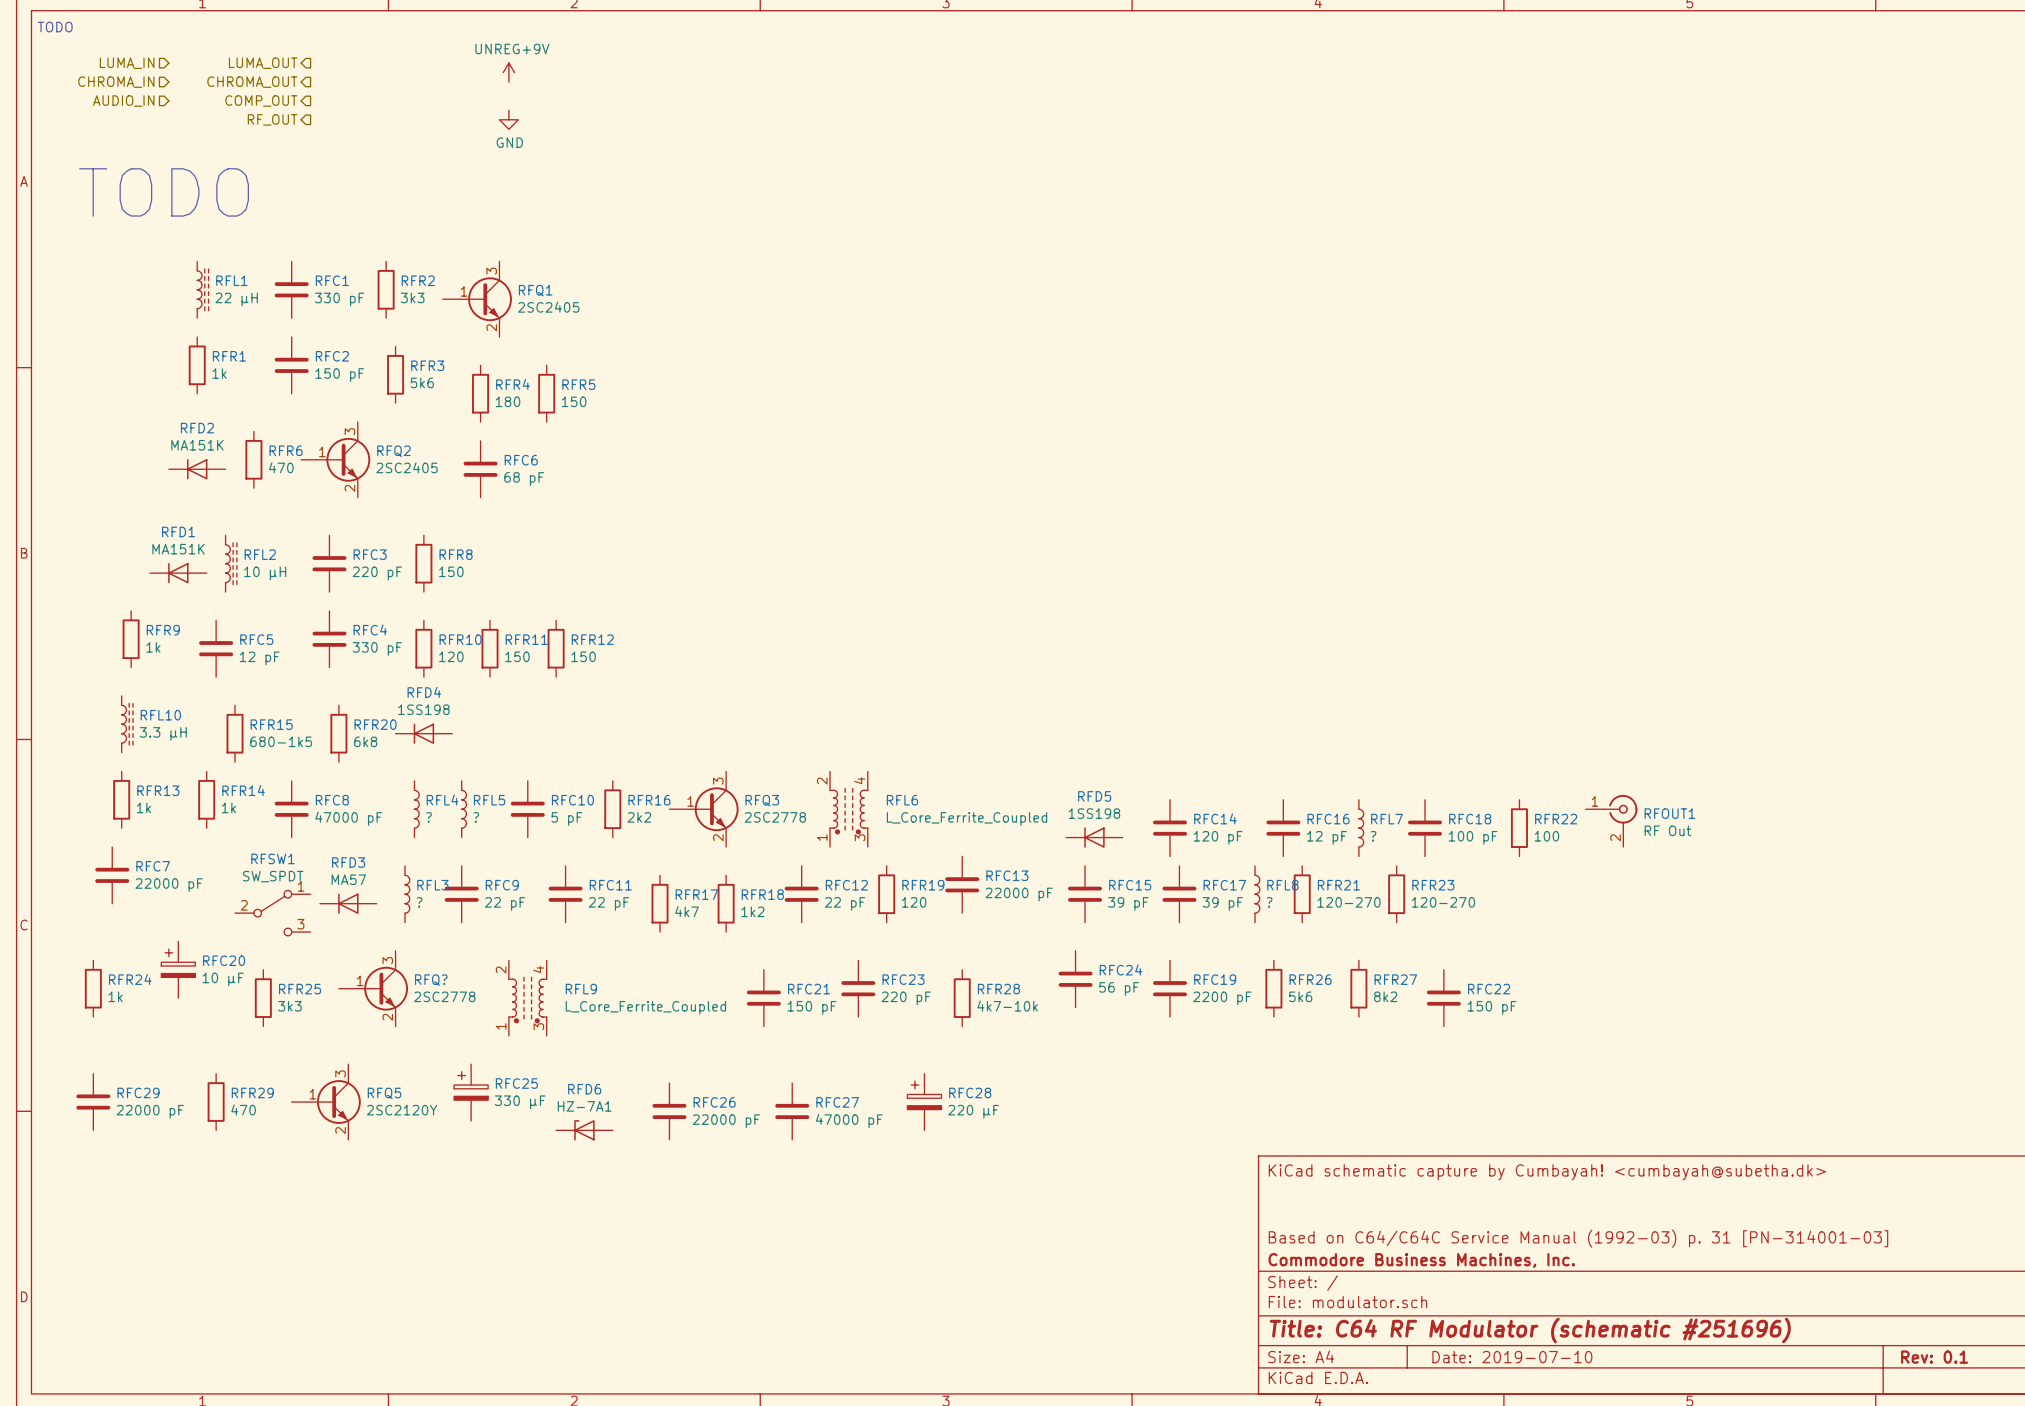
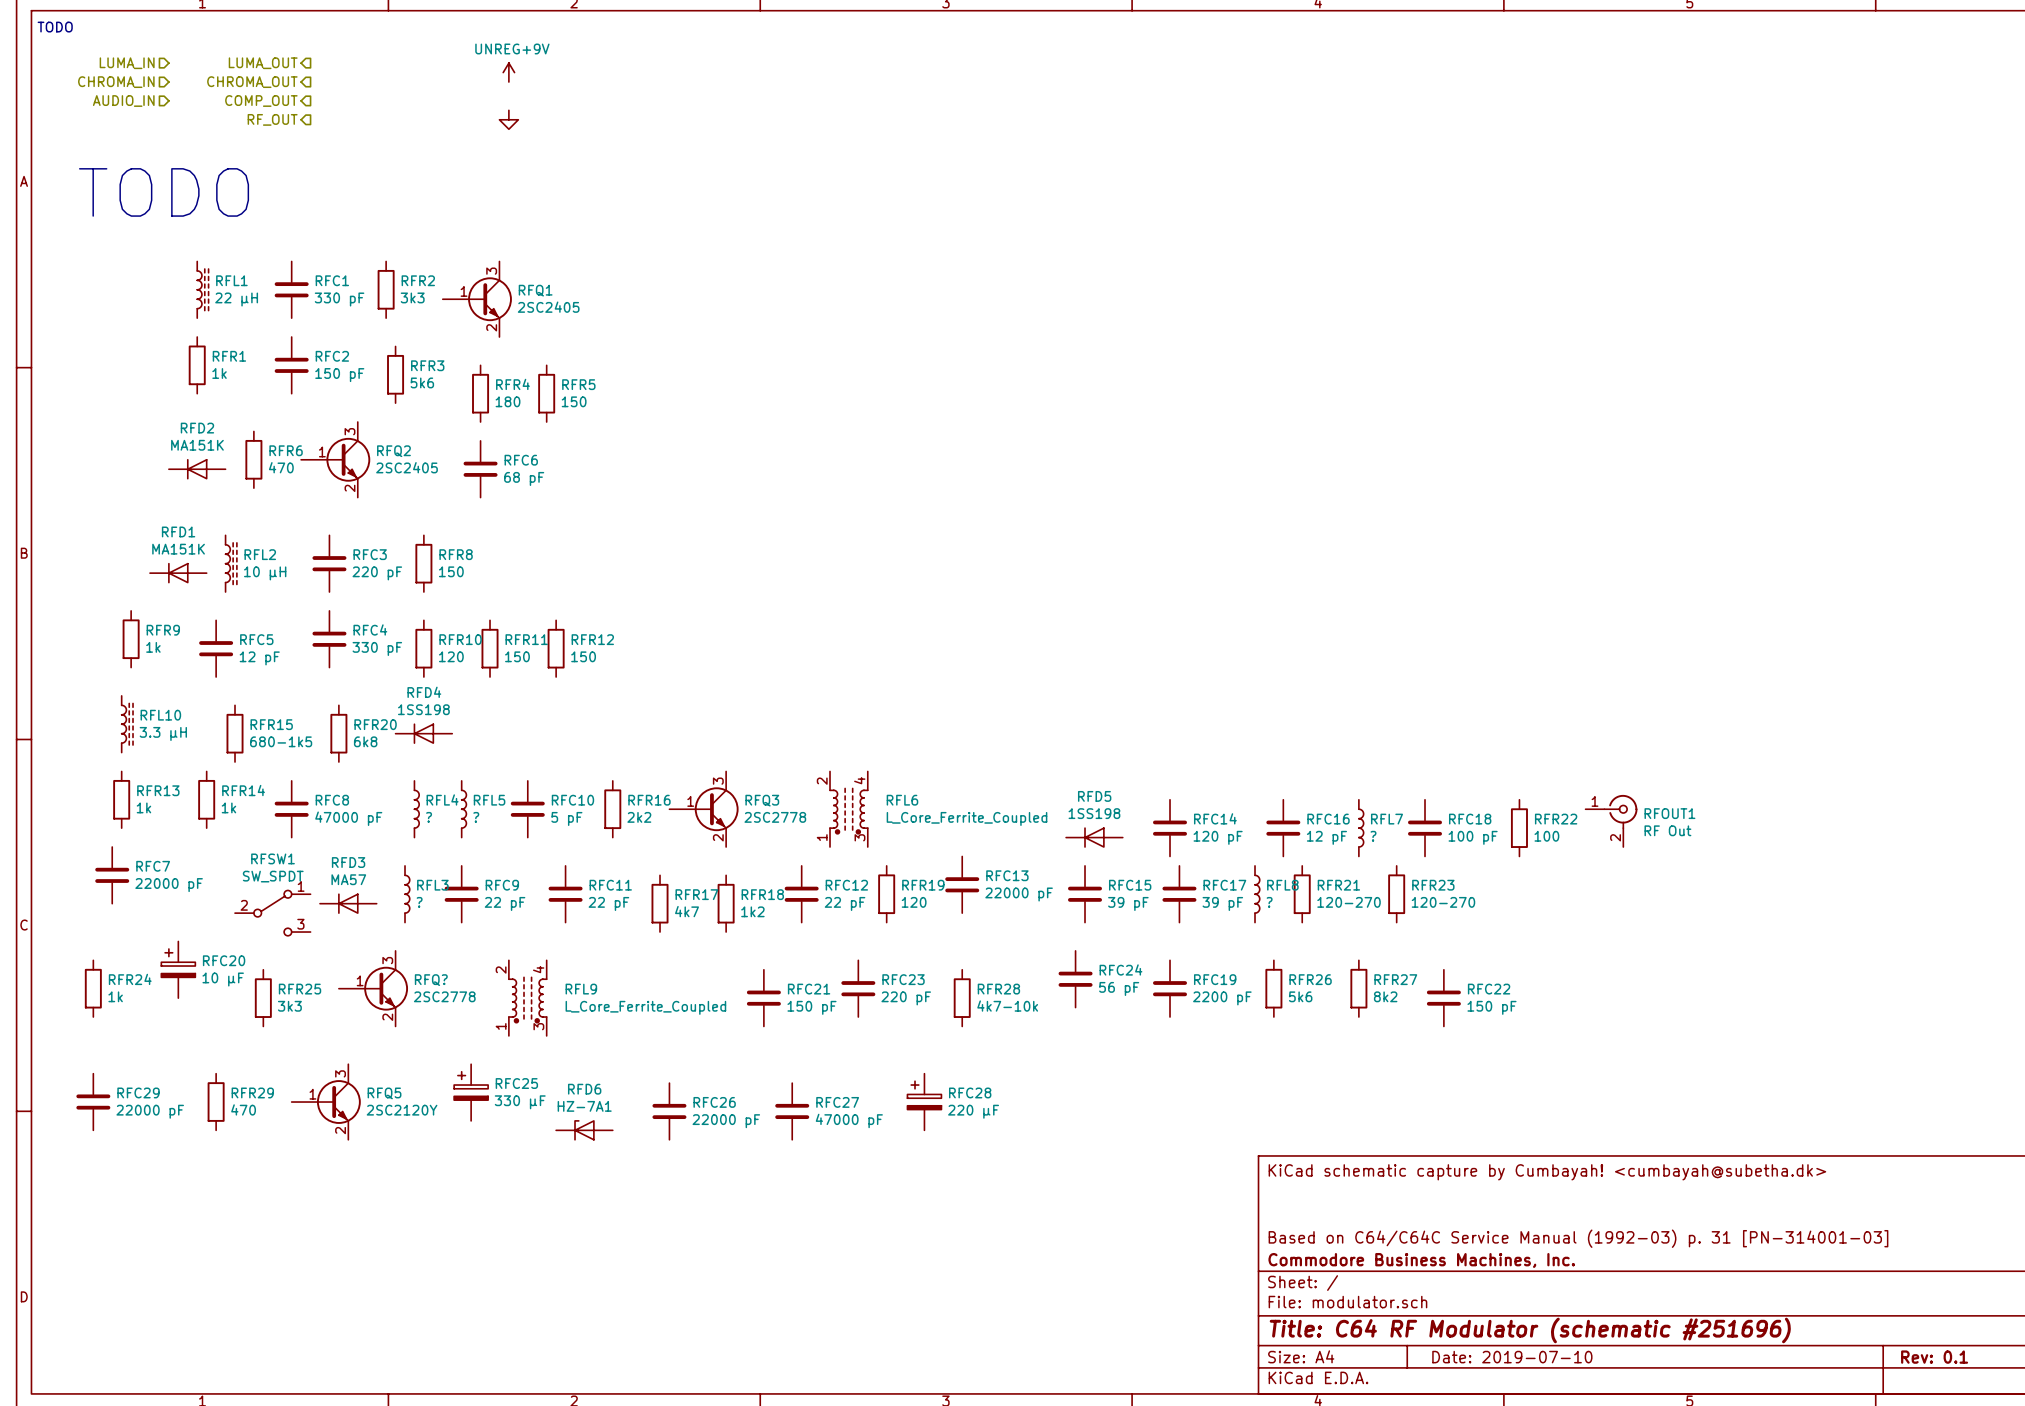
power symbol text: GND (509, 142) -> none

